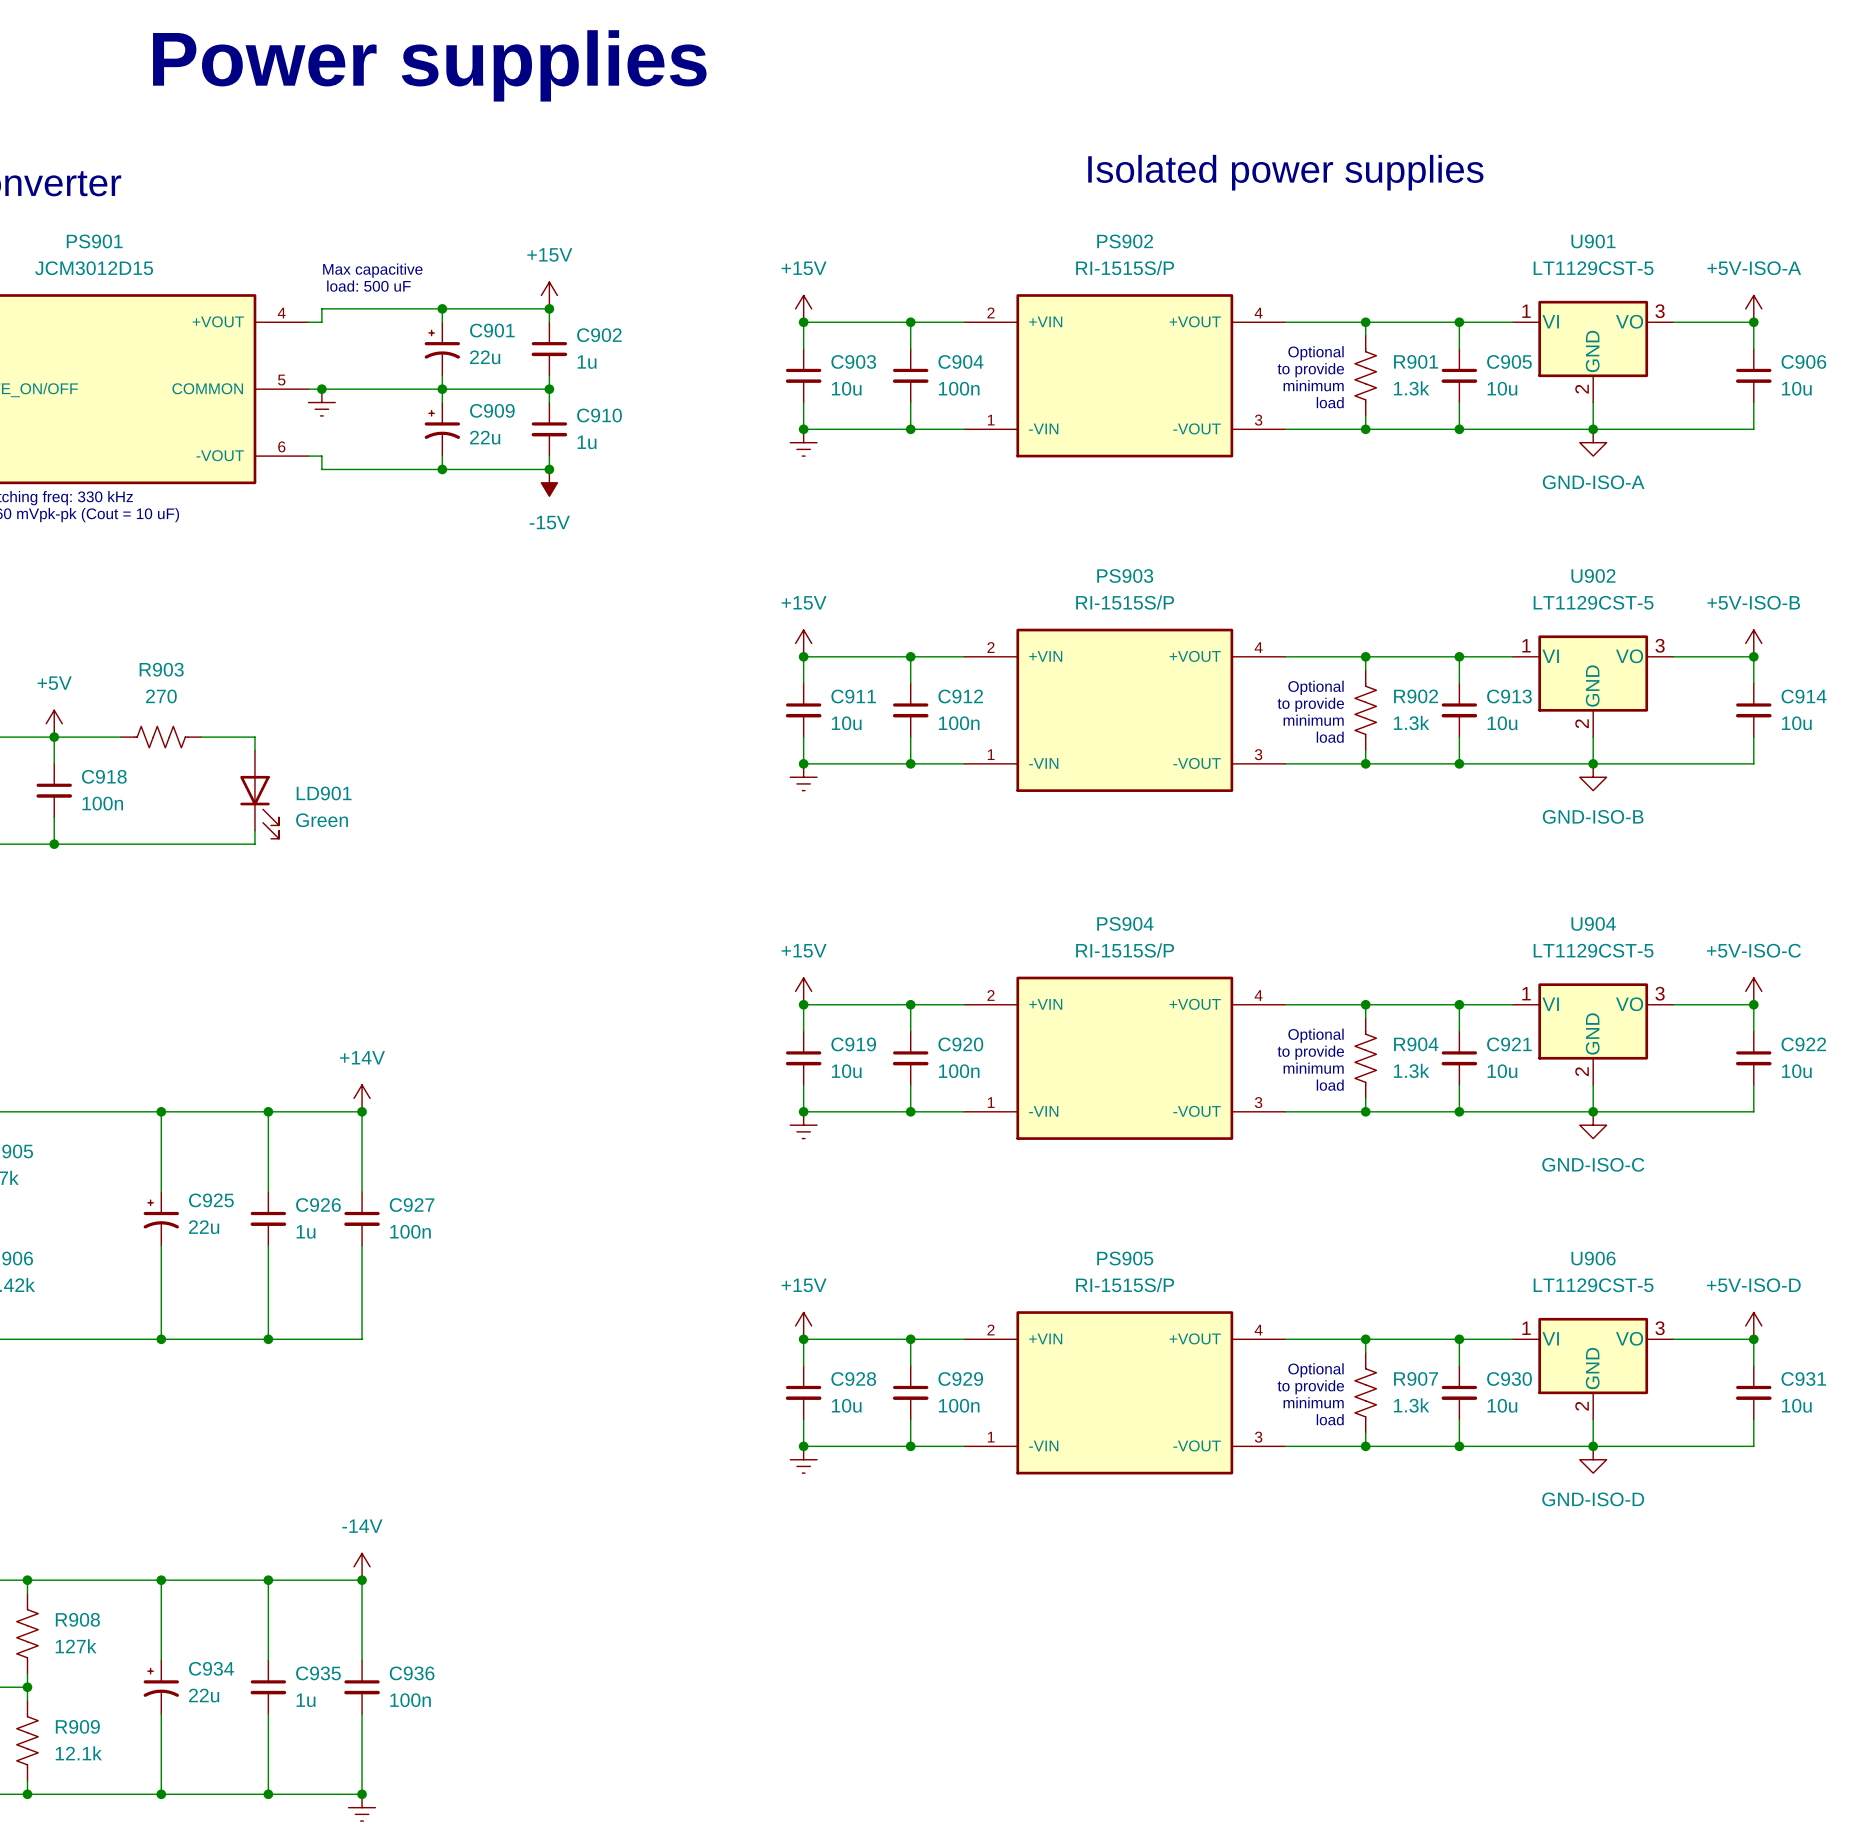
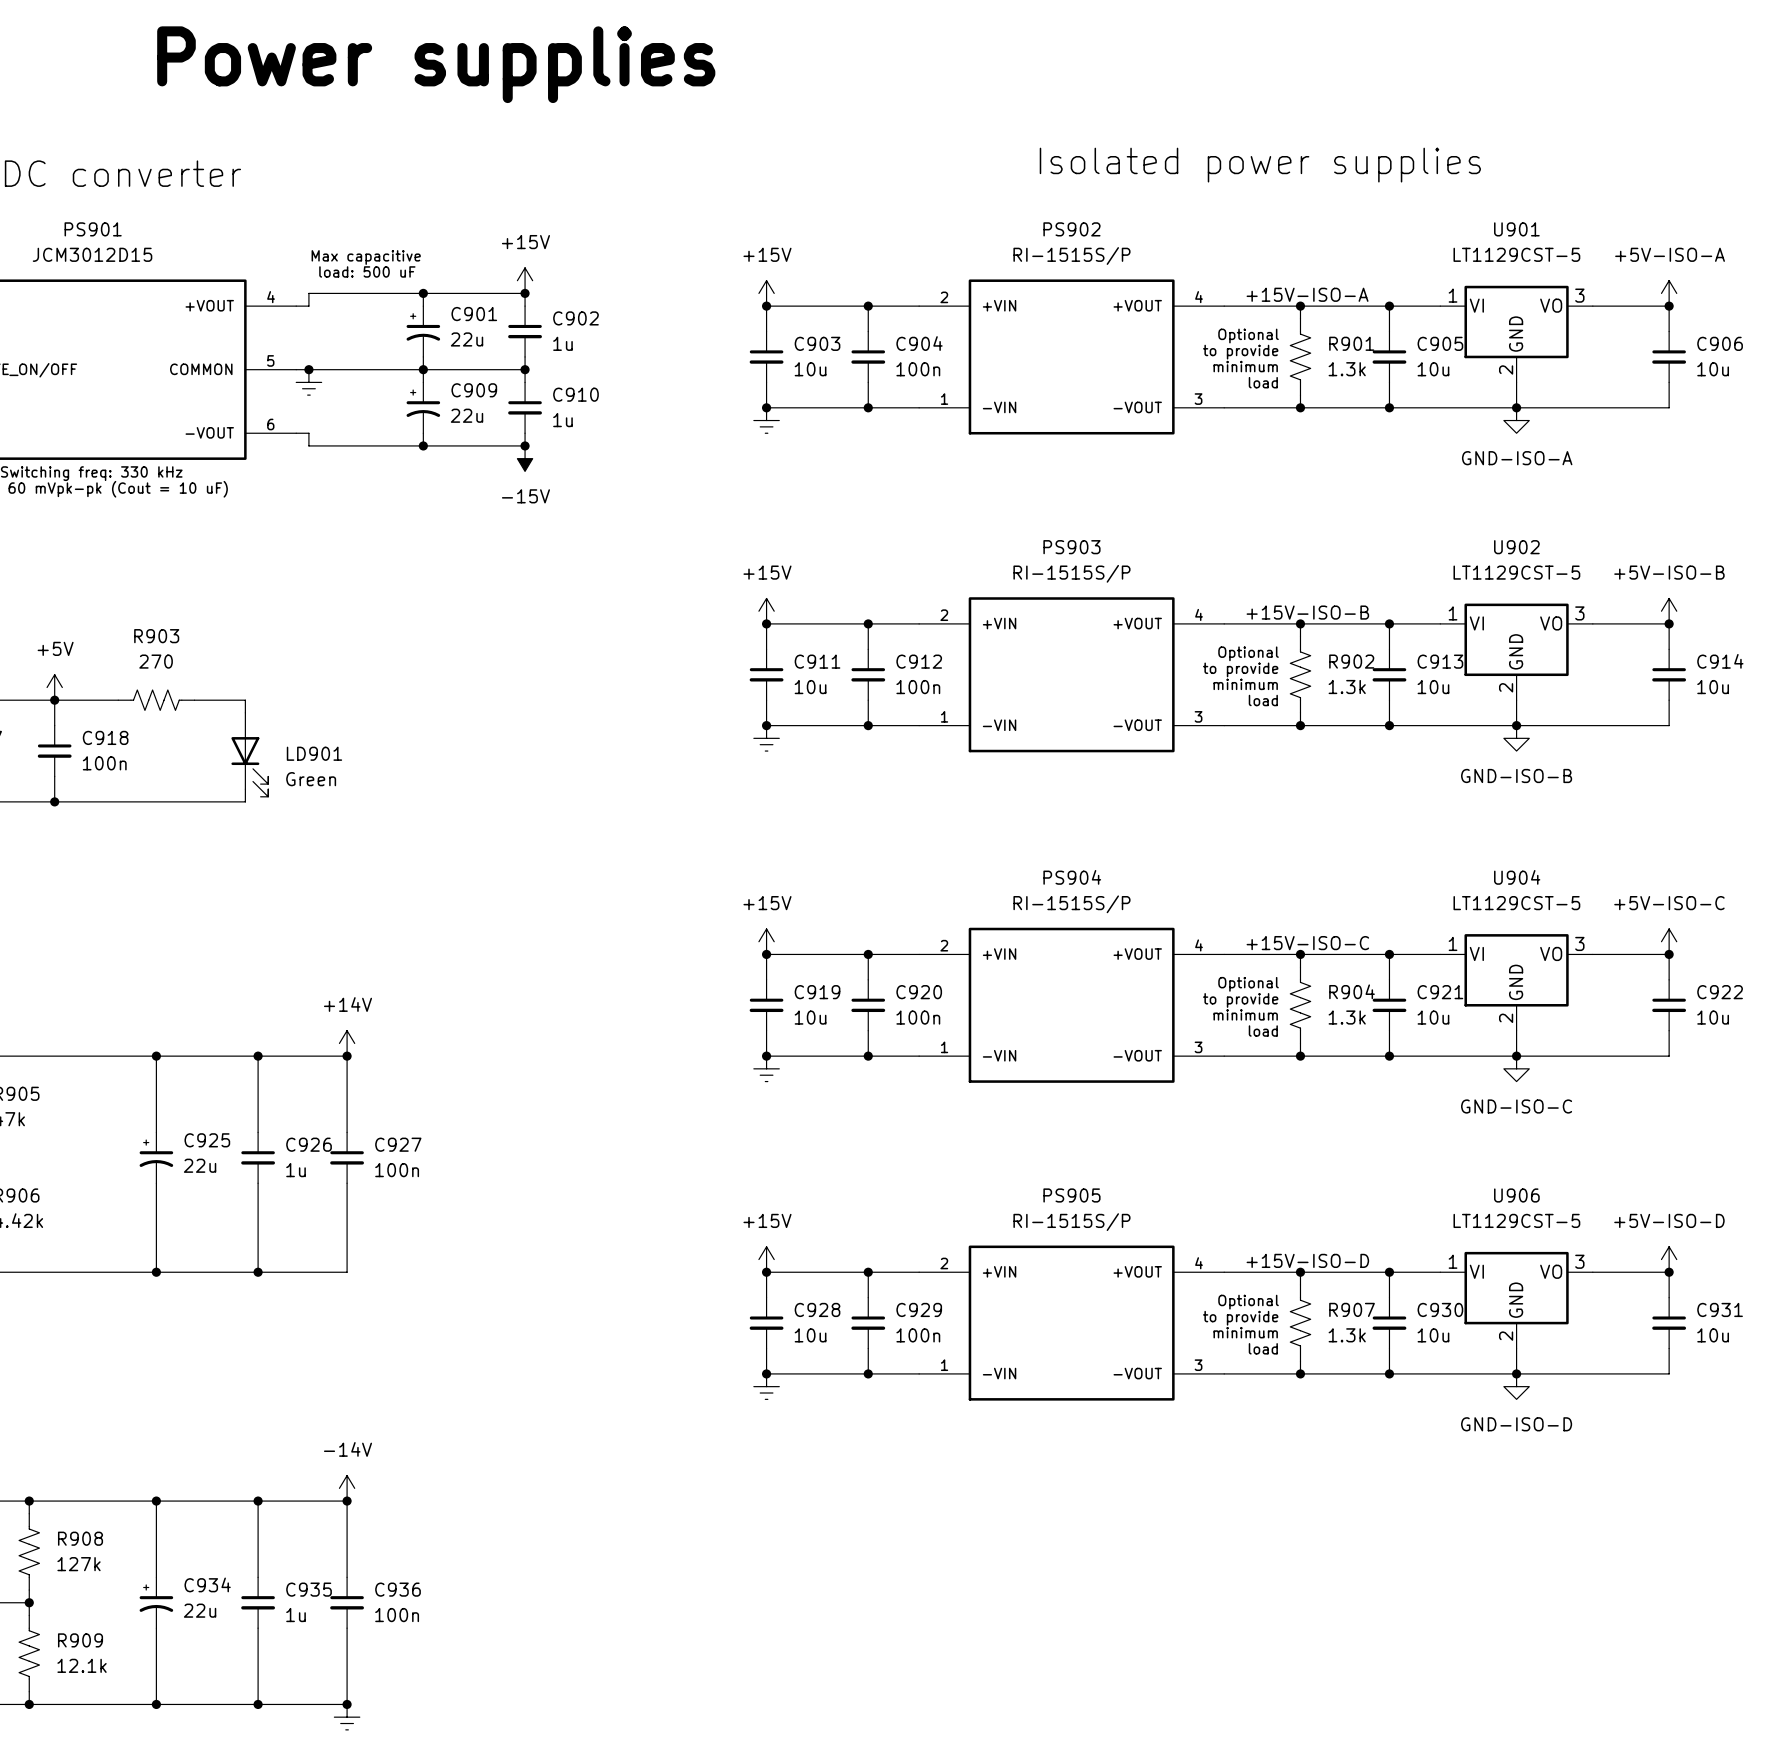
label: none -> +15V-ISO-A (1307, 294)
label: none -> +15V-ISO-B (1307, 612)
label: none -> +15V-ISO-C (1307, 943)
label: none -> +15V-ISO-D (1307, 1260)

